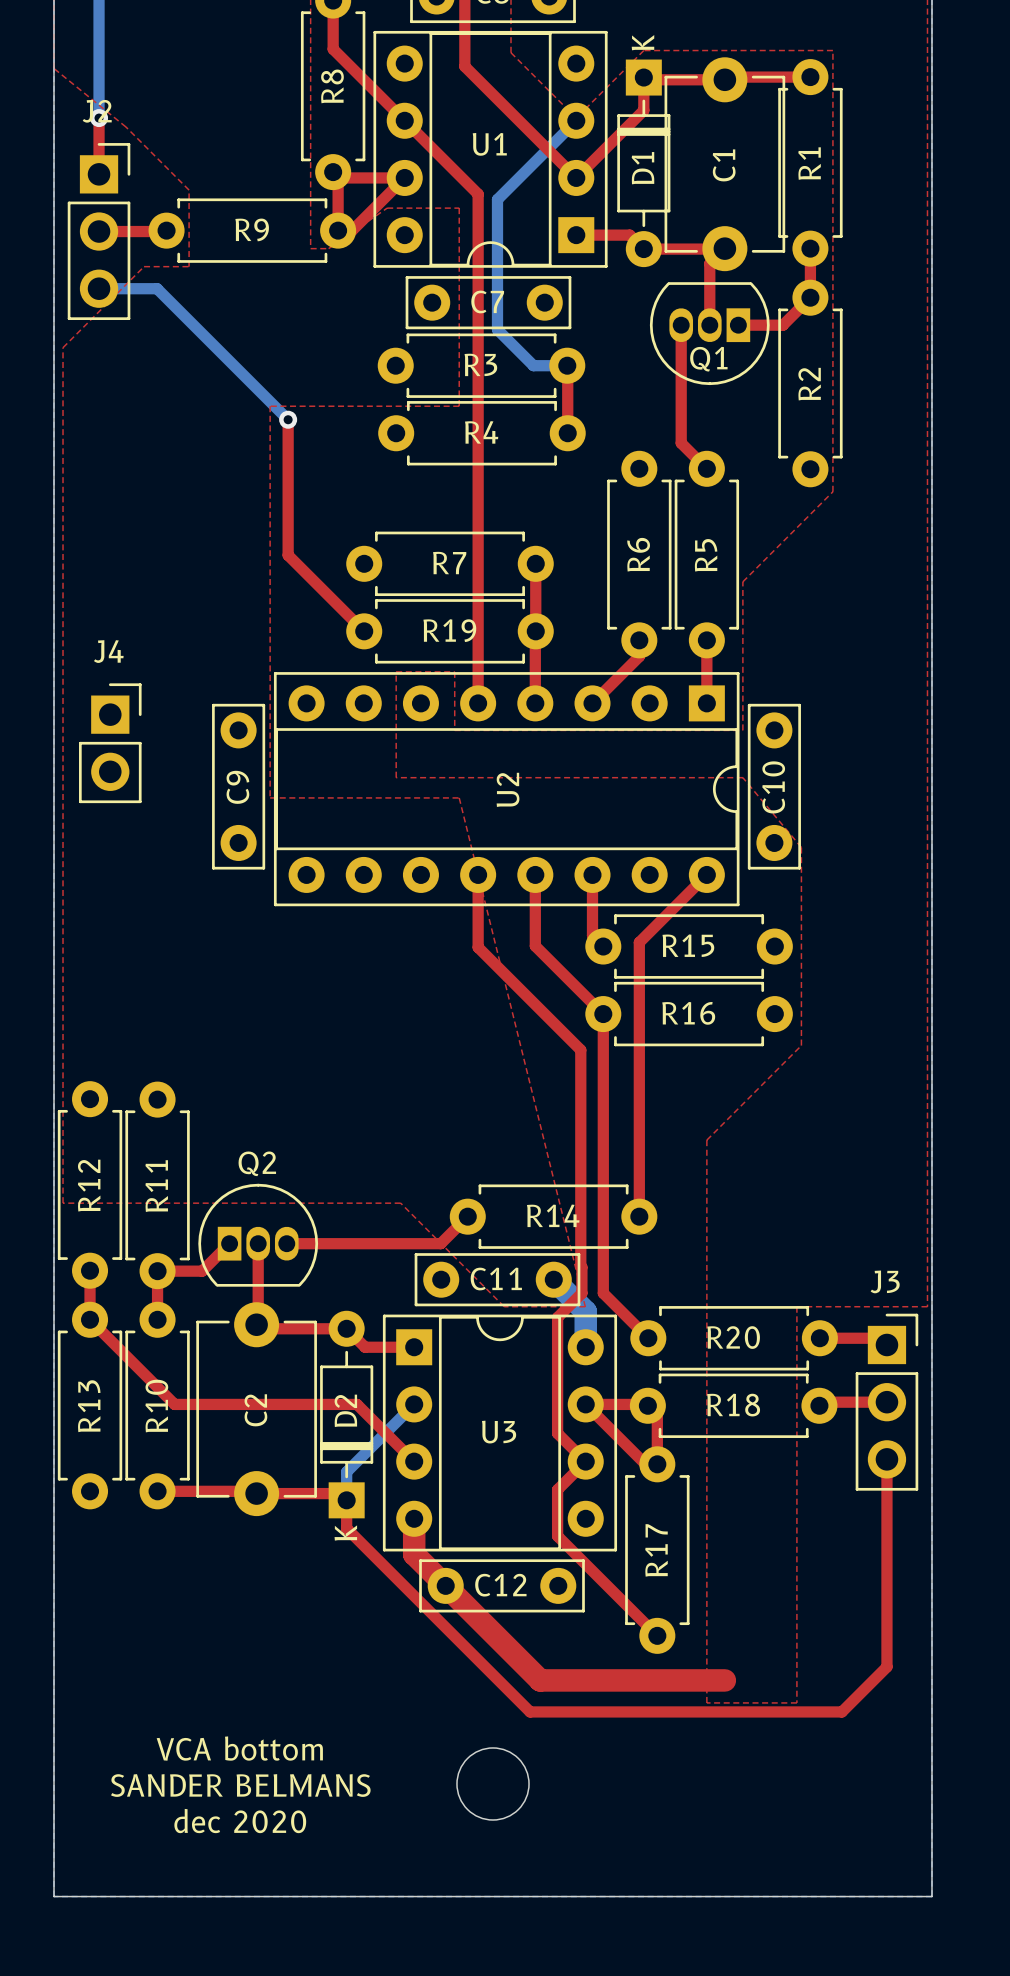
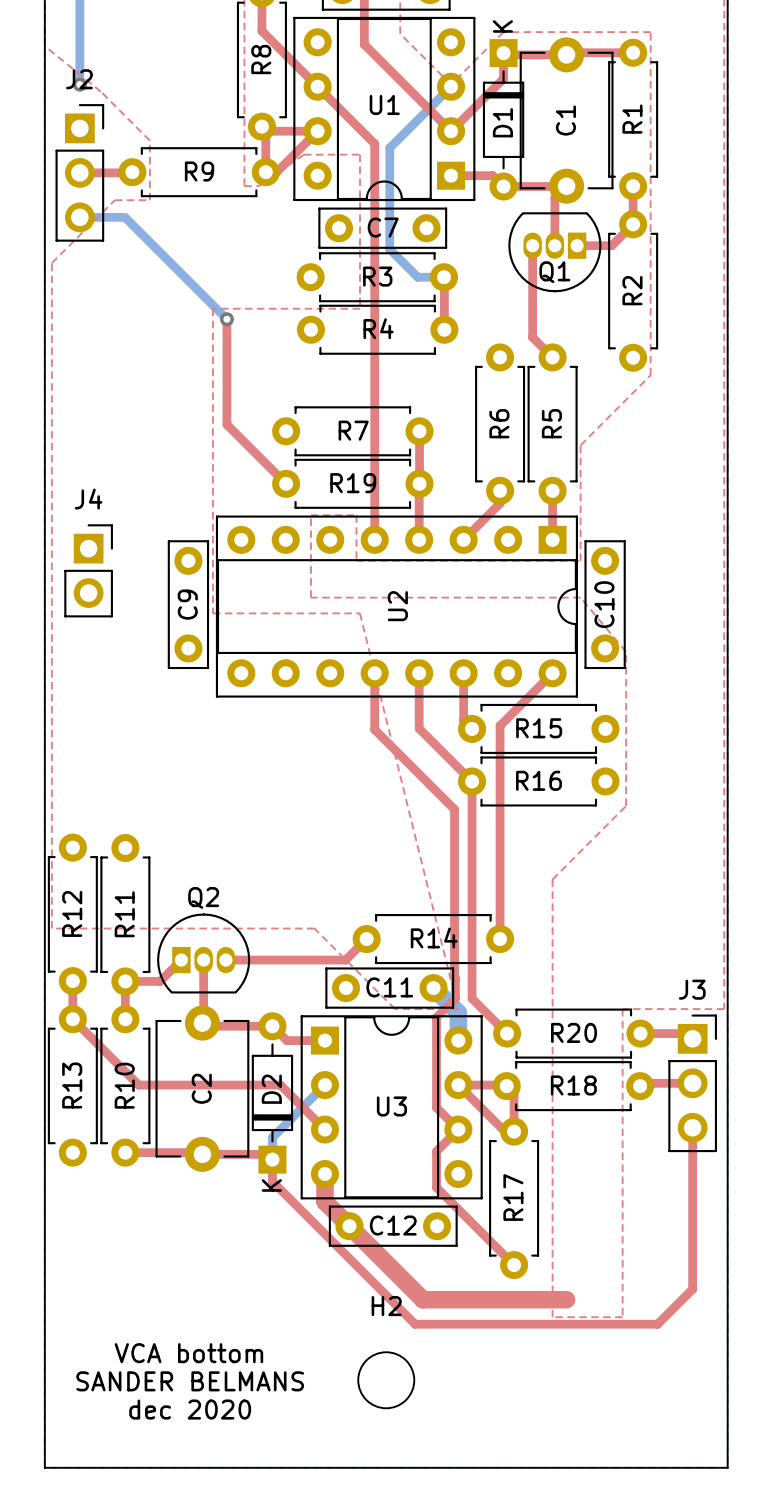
top track: (99, 118) (99, 174) -> none
H2 name: none -> H2 (386, 1306)

